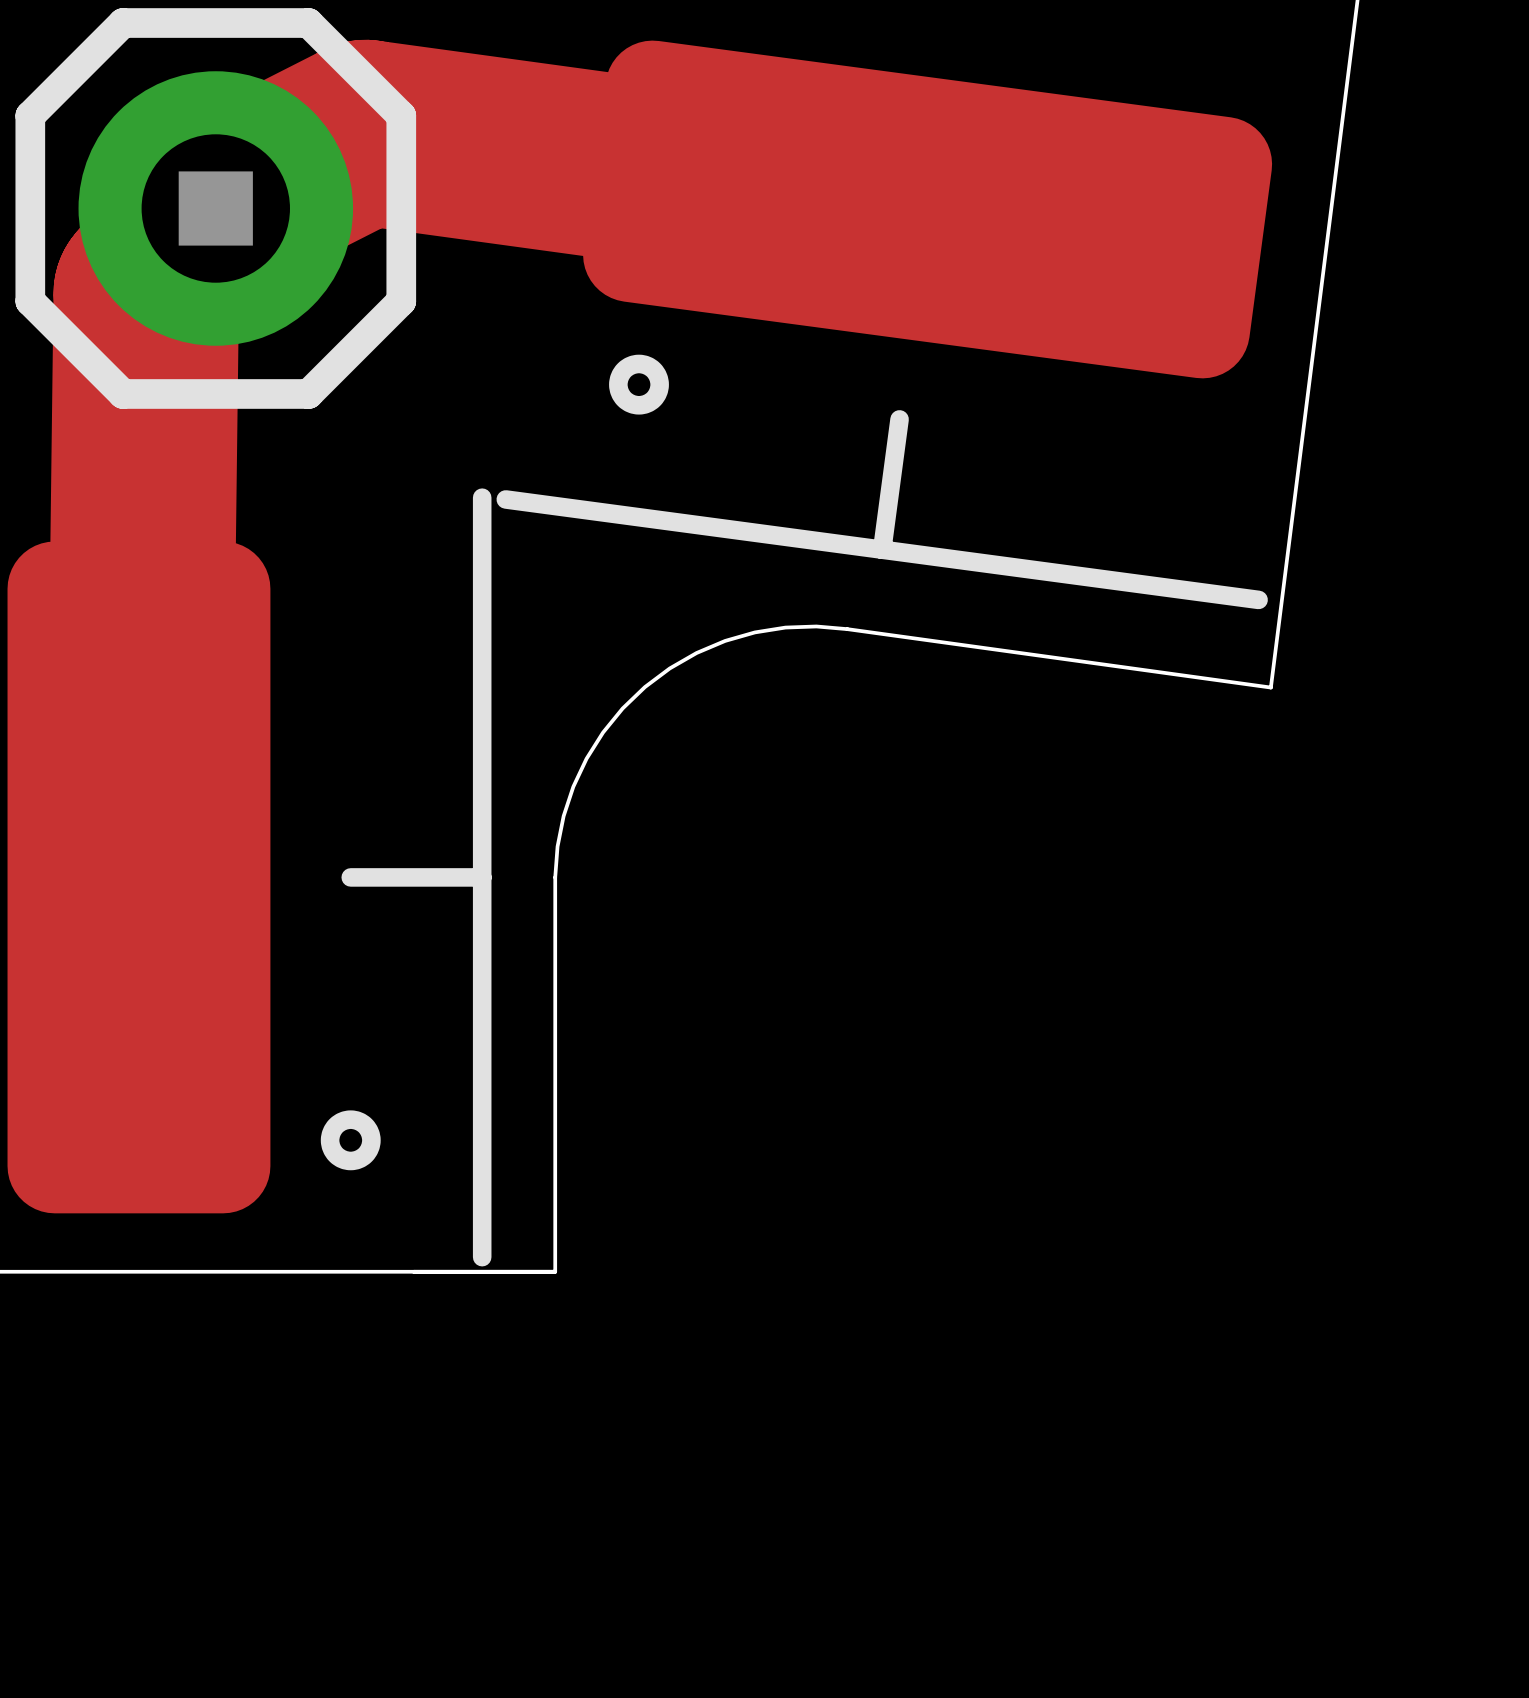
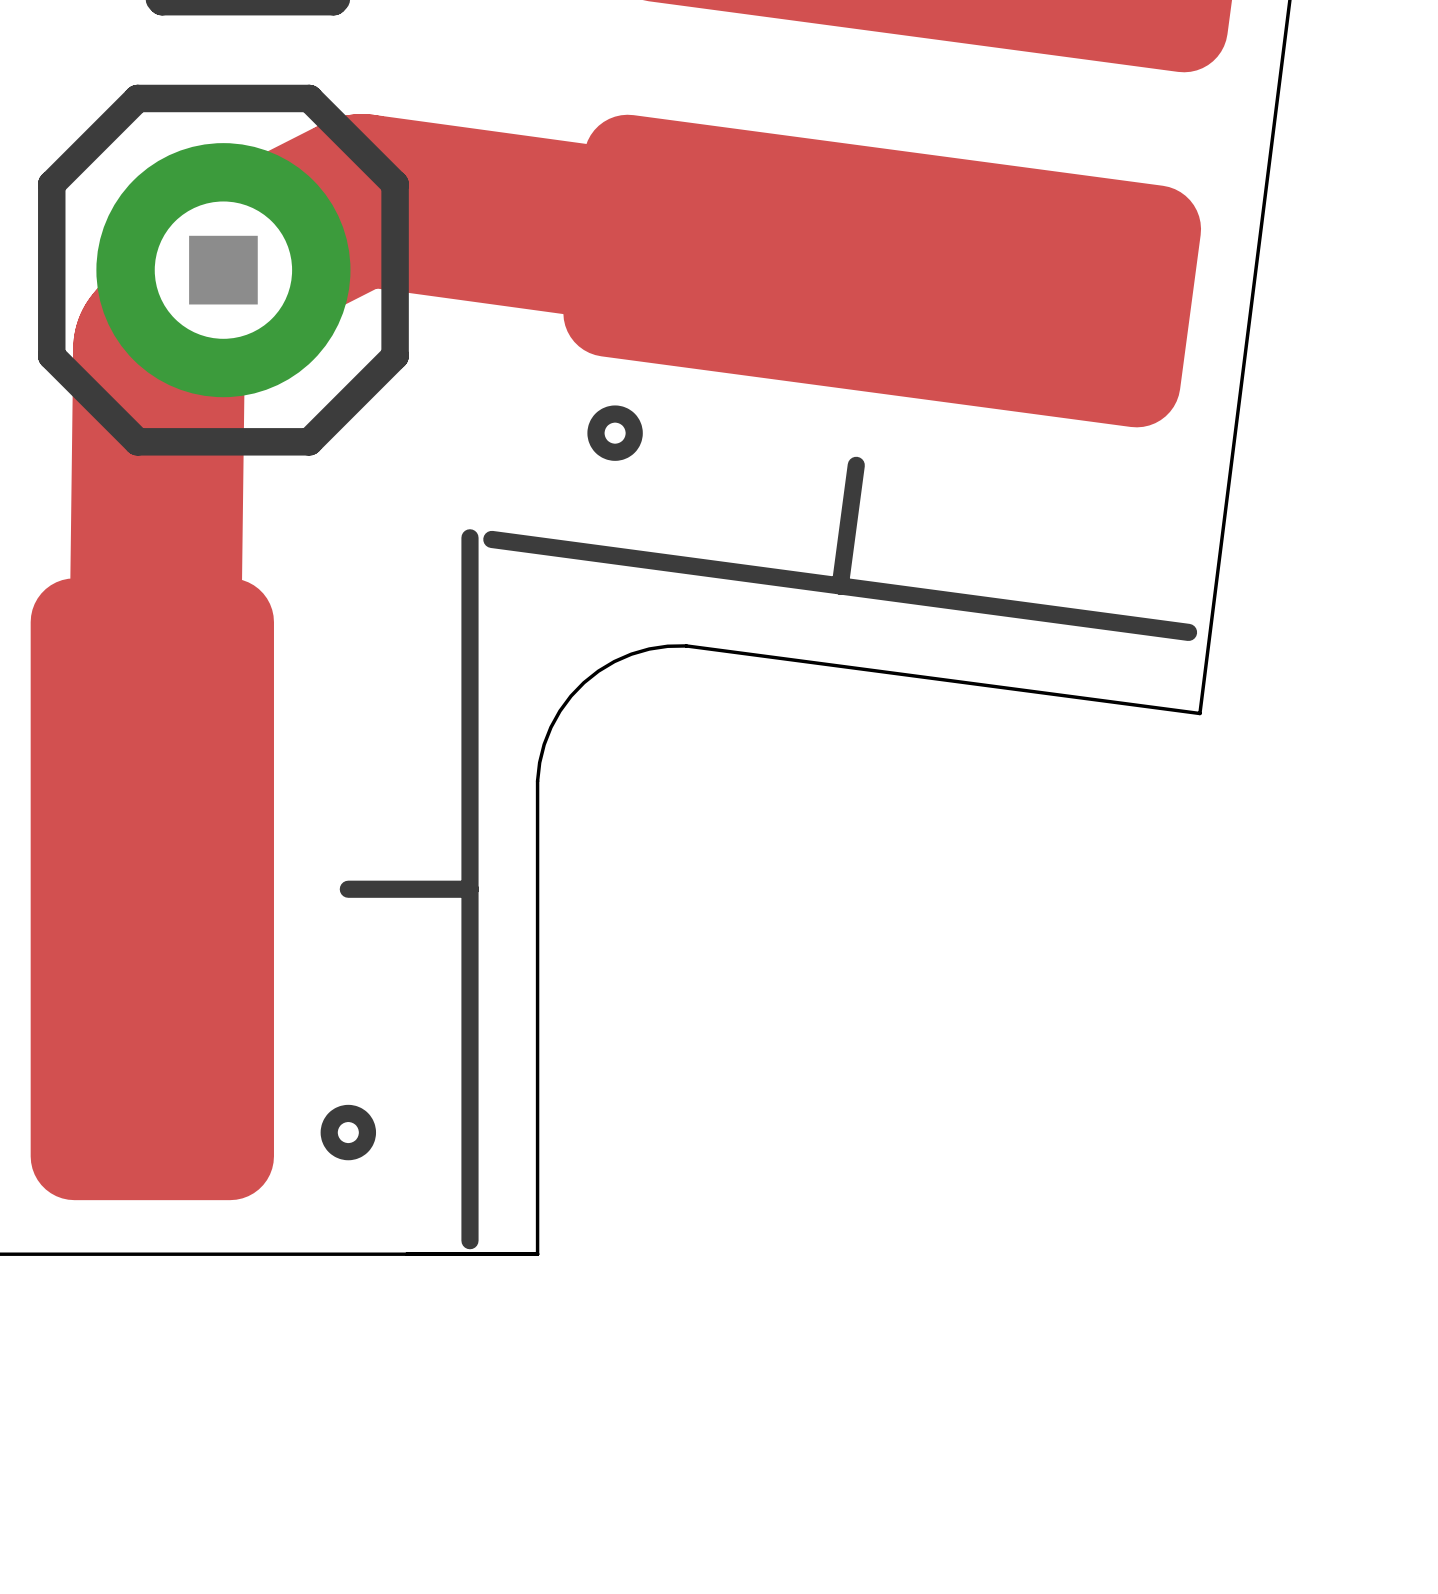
board edge: (1270, 687) (847, 629) (816, 626) (785, 627) (754, 632) (725, 640) (696, 653) (669, 668) (644, 687) (622, 708) (603, 732) (586, 758) (573, 786) (563, 816) (557, 846) (555, 877) -> (1199, 713) (686, 645) (649, 649) (614, 661) (598, 671) (571, 696) (550, 727) (544, 744) (537, 781) (537, 889)

